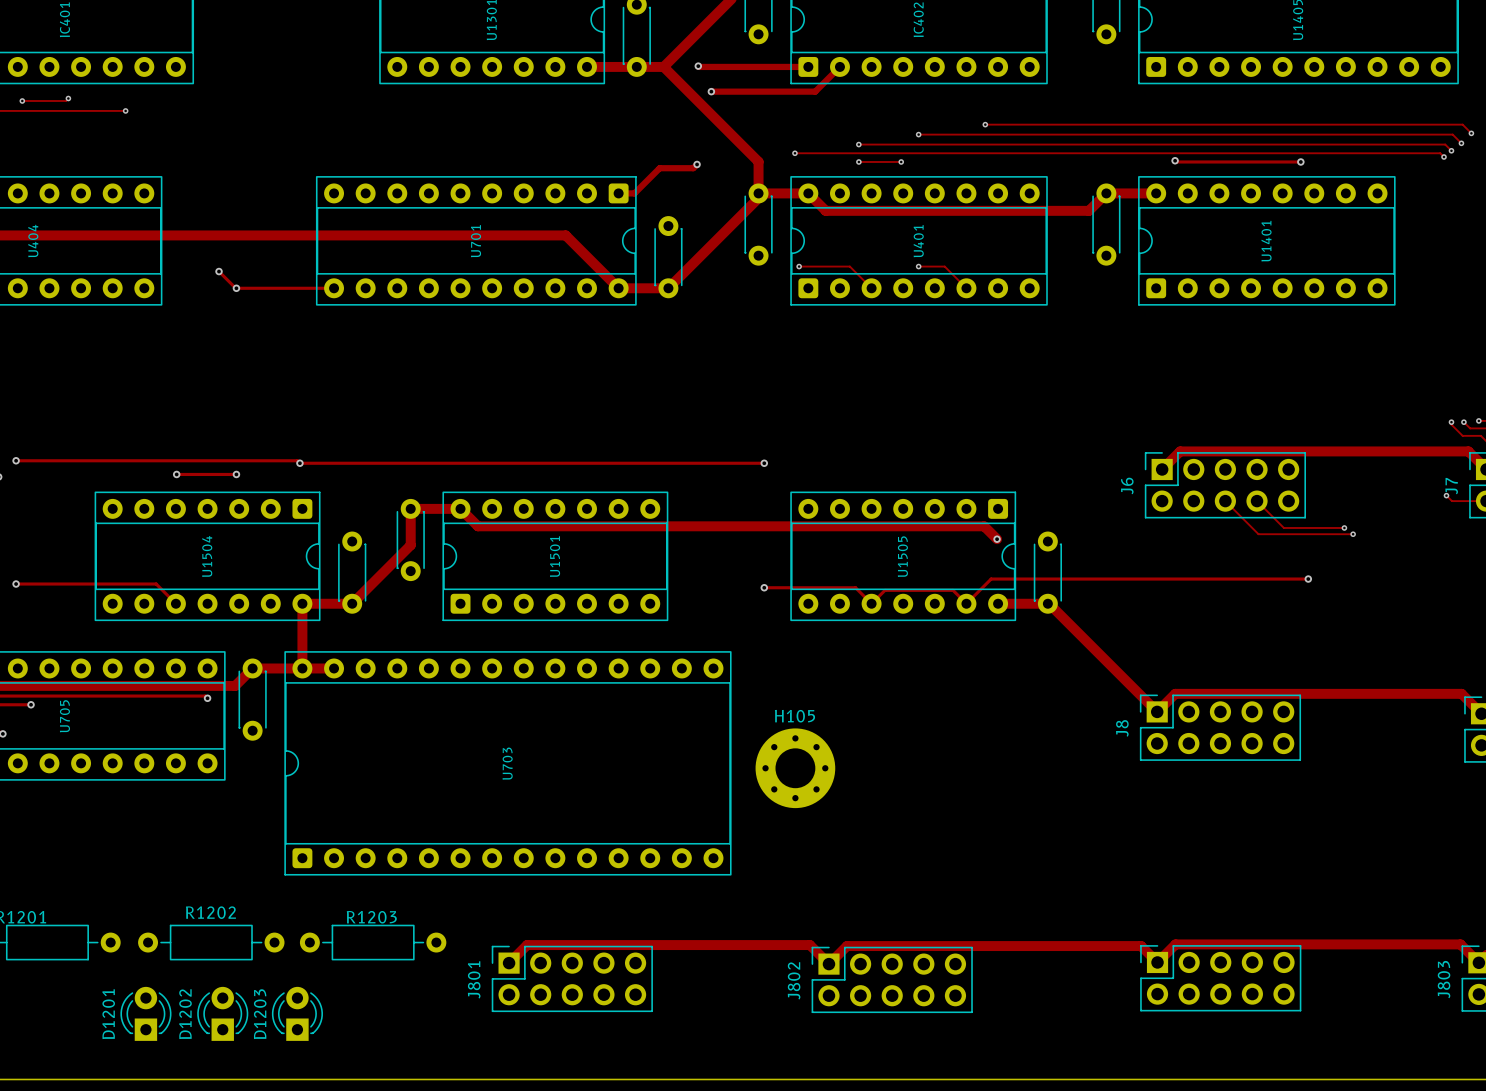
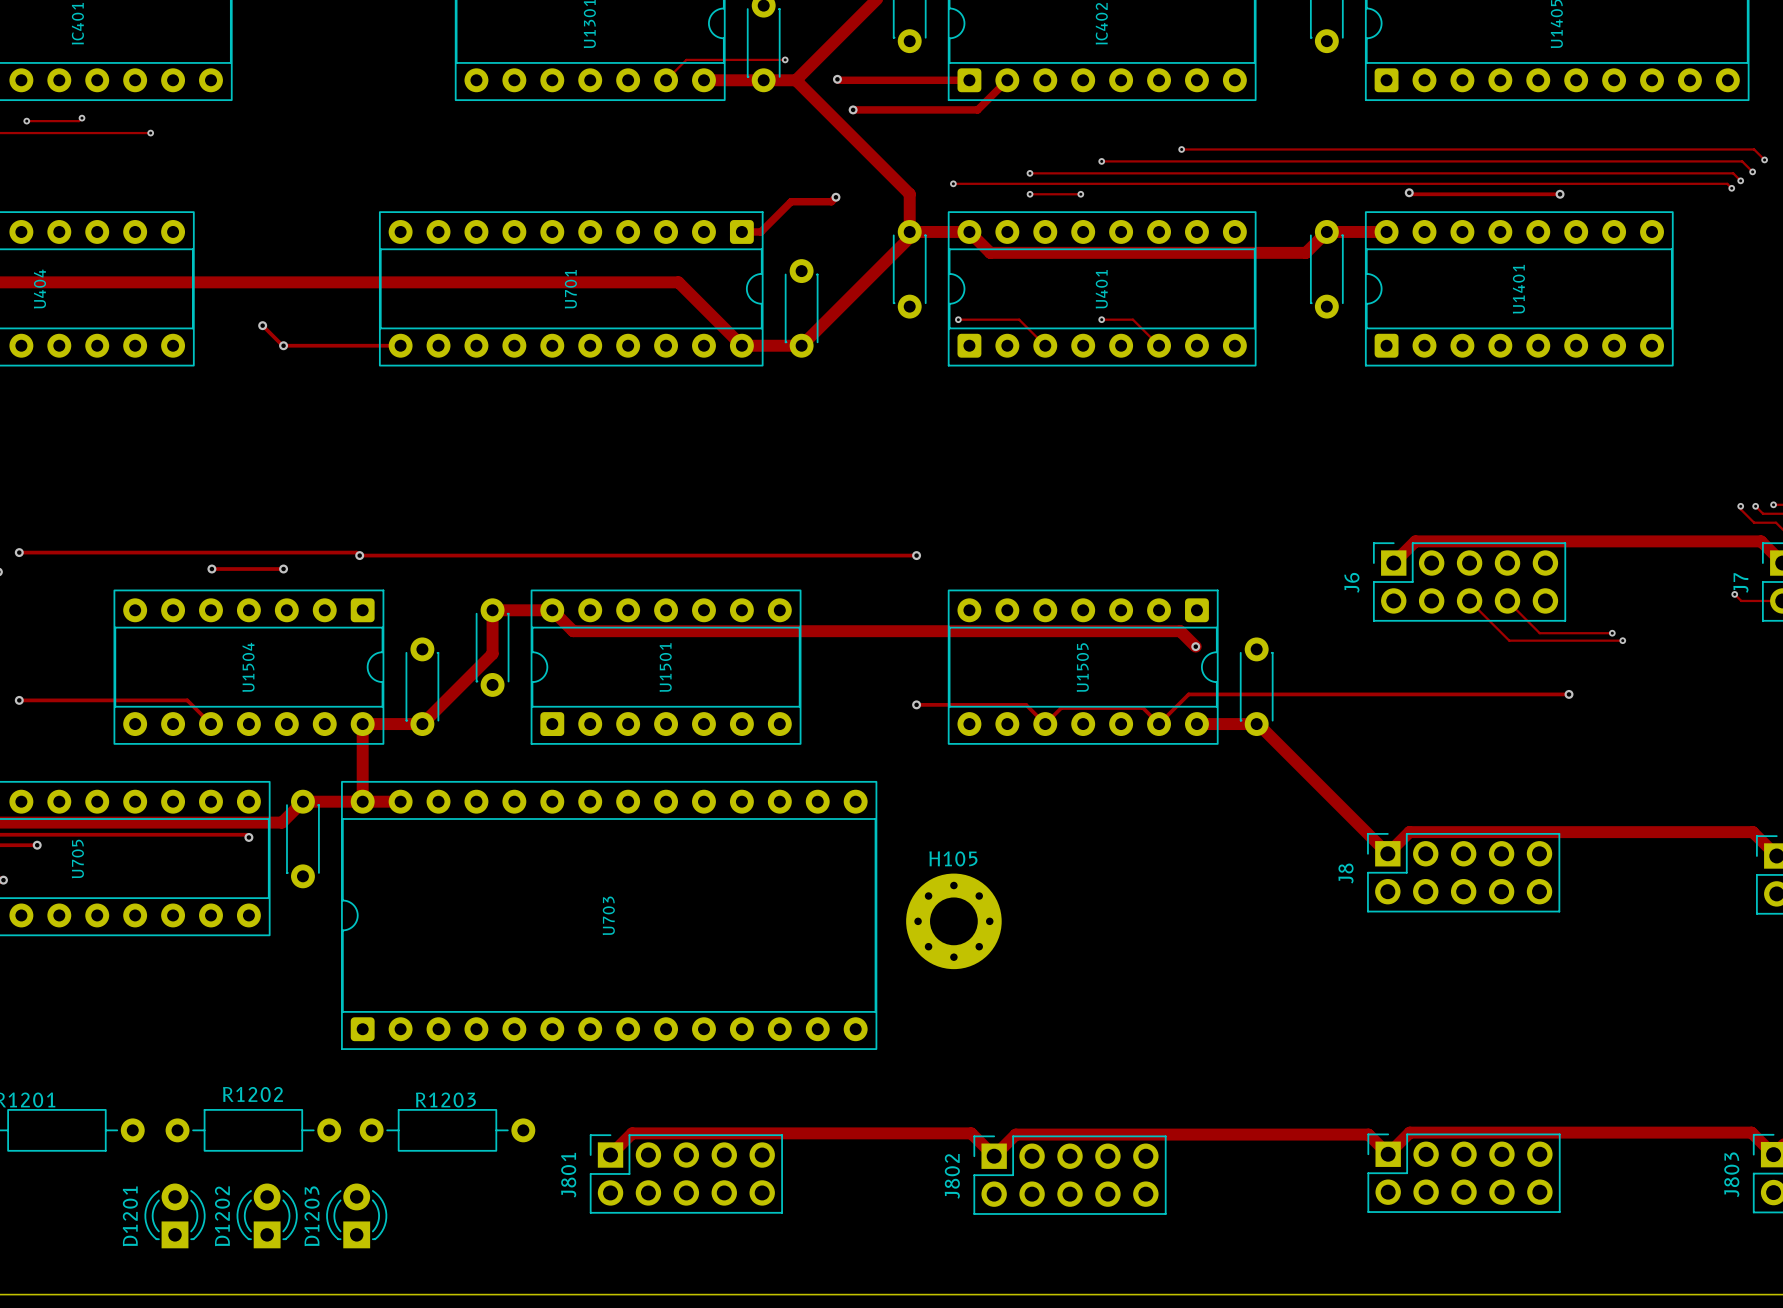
track: none -> (785, 59) (686, 59) (666, 80)
via: none -> (785, 59)

